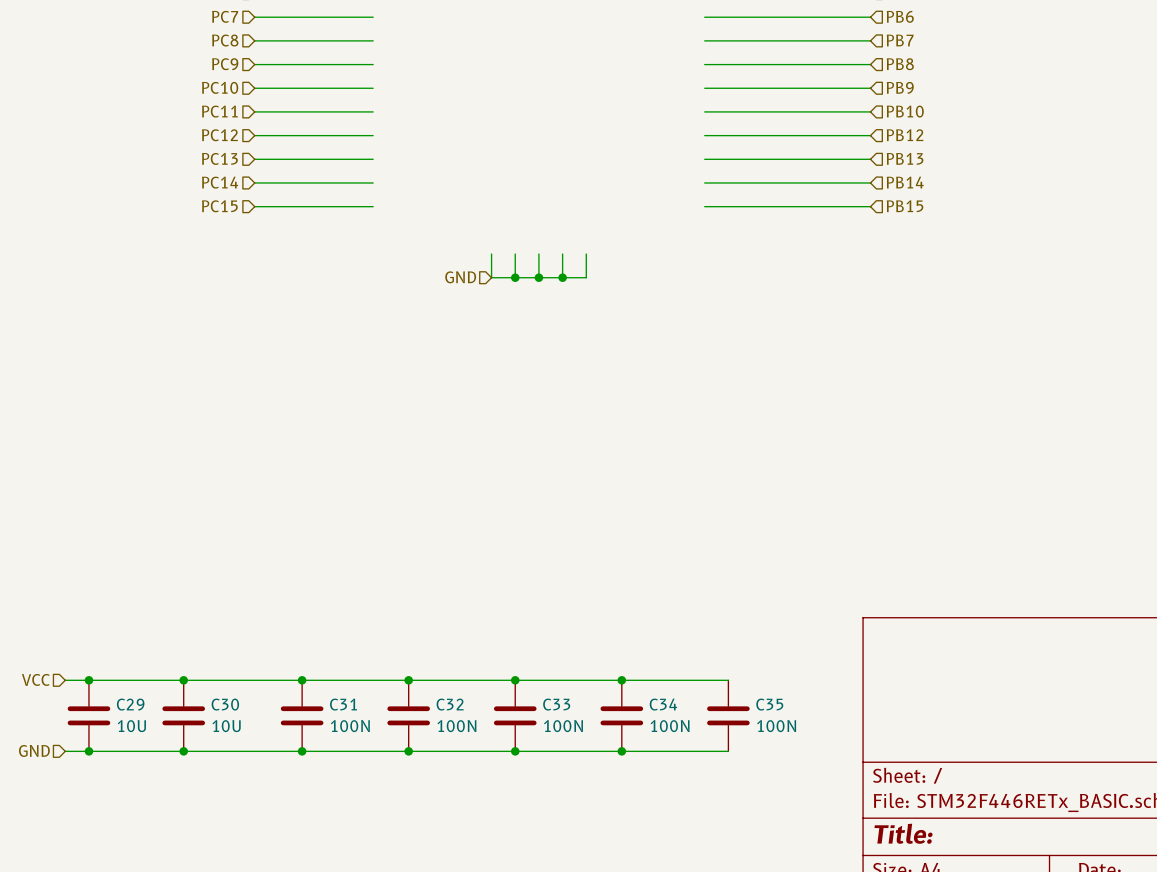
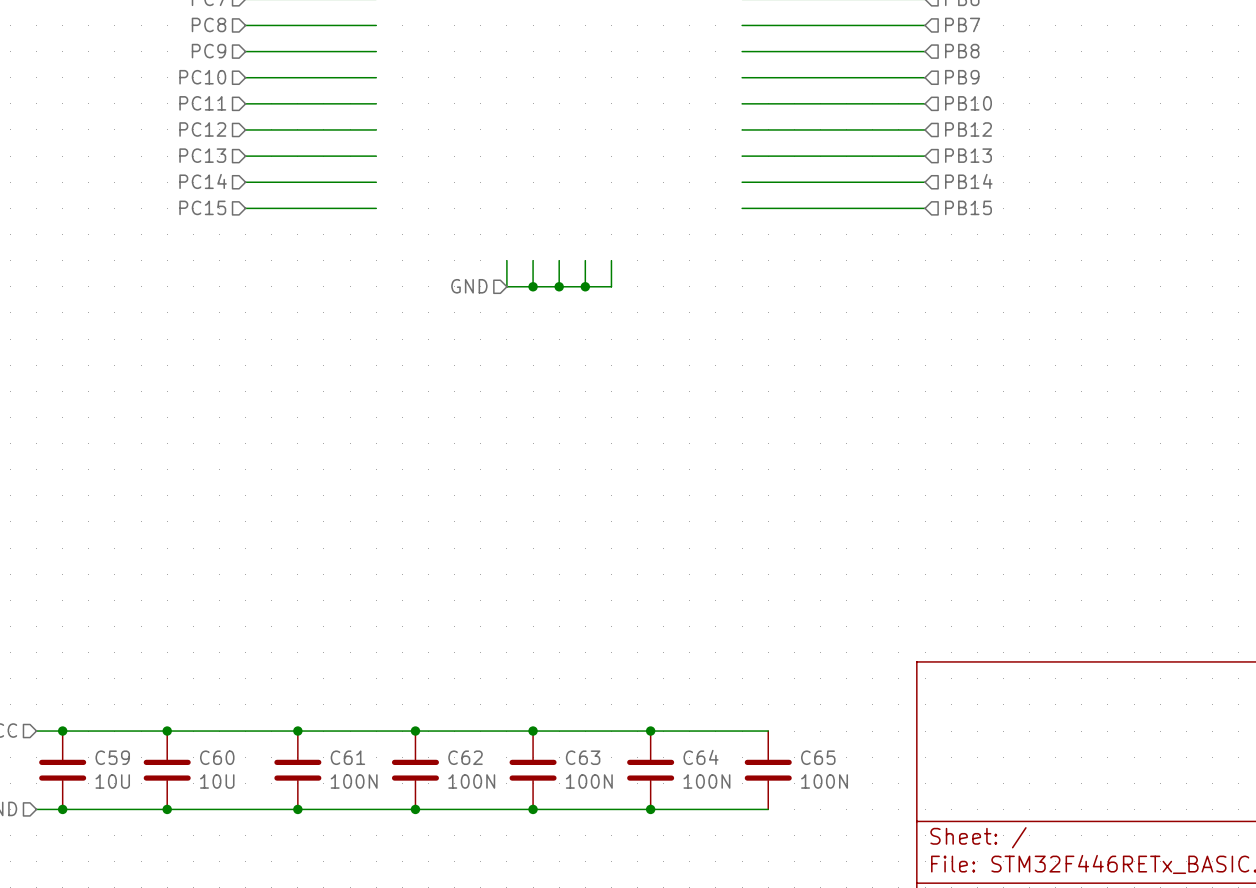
C29 name: C29 (130, 704) -> C59 (112, 757)
C30 name: C30 (225, 704) -> C60 (217, 757)
C31 name: C31 (343, 704) -> C61 (347, 757)
C32 name: C32 (450, 704) -> C62 (465, 757)
C33 name: C33 (556, 704) -> C63 (583, 757)
C34 name: C34 (663, 704) -> C64 (701, 757)
C35 name: C35 (769, 704) -> C65 (818, 757)

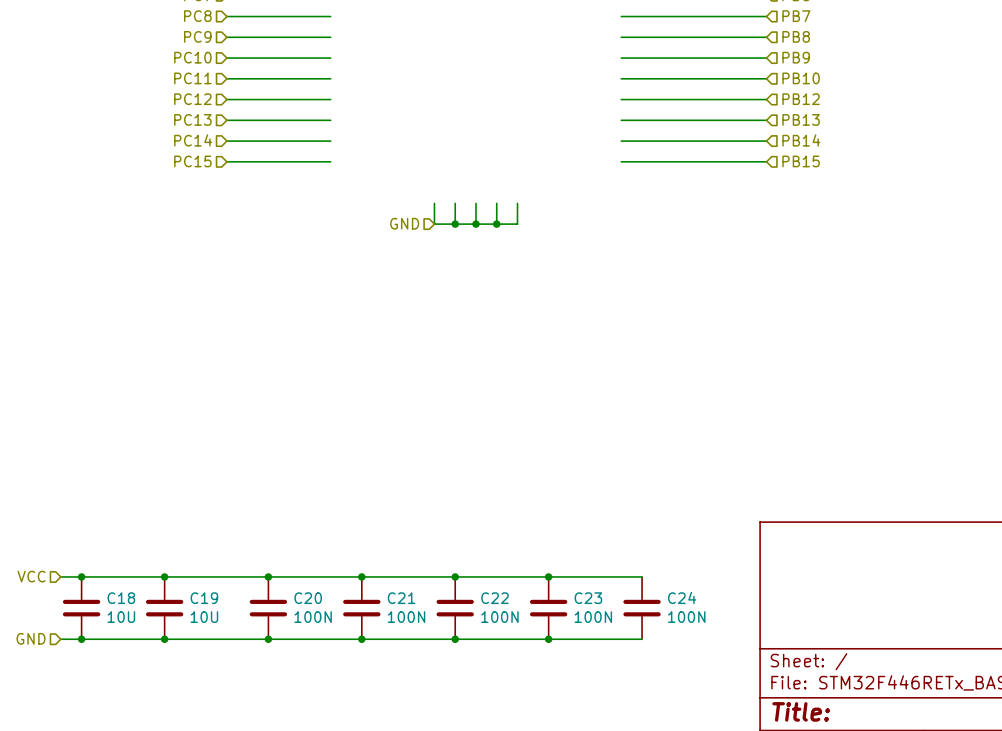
C59 name: C59 (112, 757) -> C18 (121, 598)
C60 name: C60 (217, 757) -> C19 (204, 598)
C61 name: C61 (347, 757) -> C20 (308, 598)
C62 name: C62 (465, 757) -> C21 (401, 598)
C63 name: C63 (583, 757) -> C22 (494, 598)
C64 name: C64 (701, 757) -> C23 (588, 598)
C65 name: C65 (818, 757) -> C24 (682, 597)

